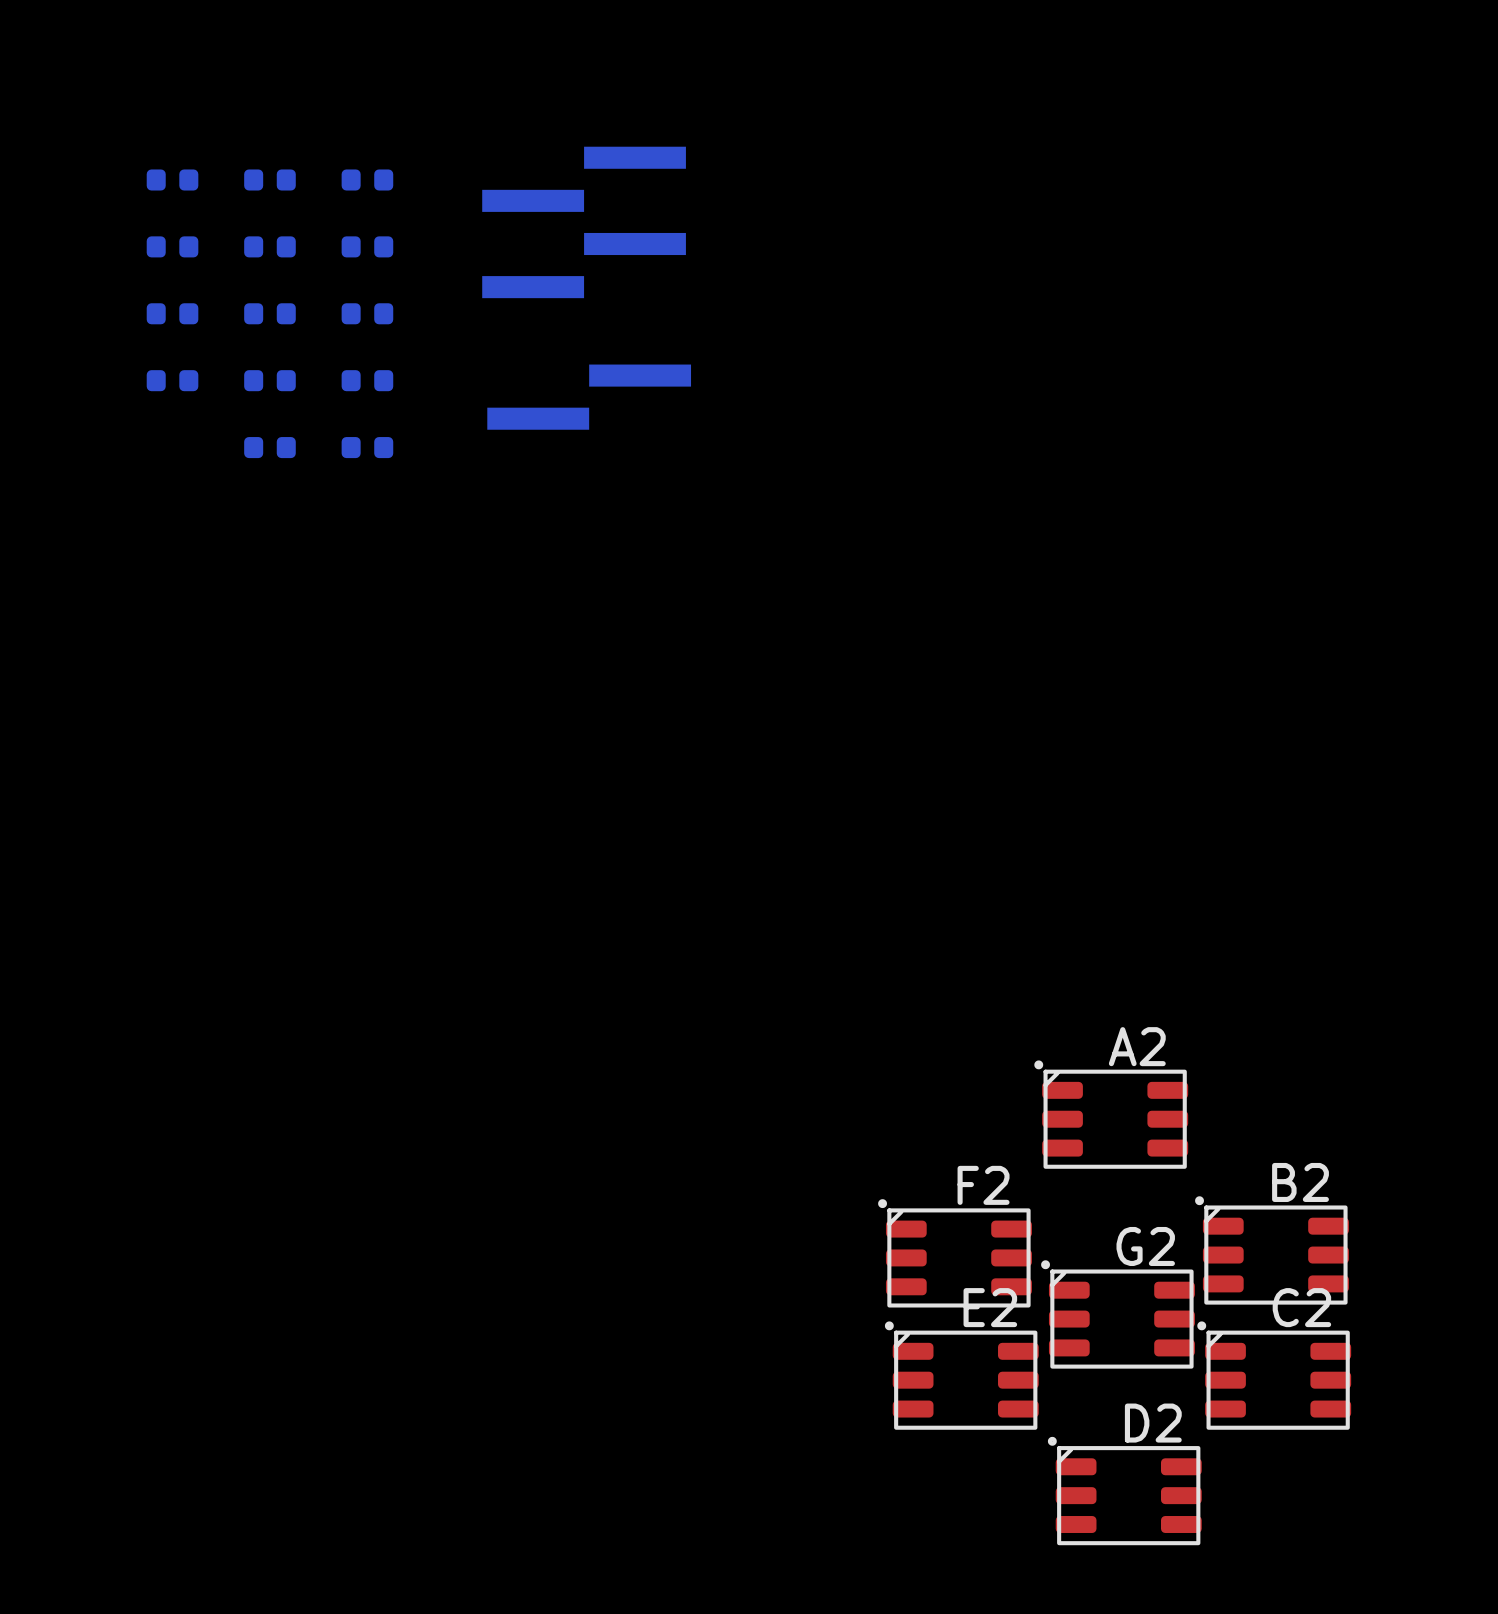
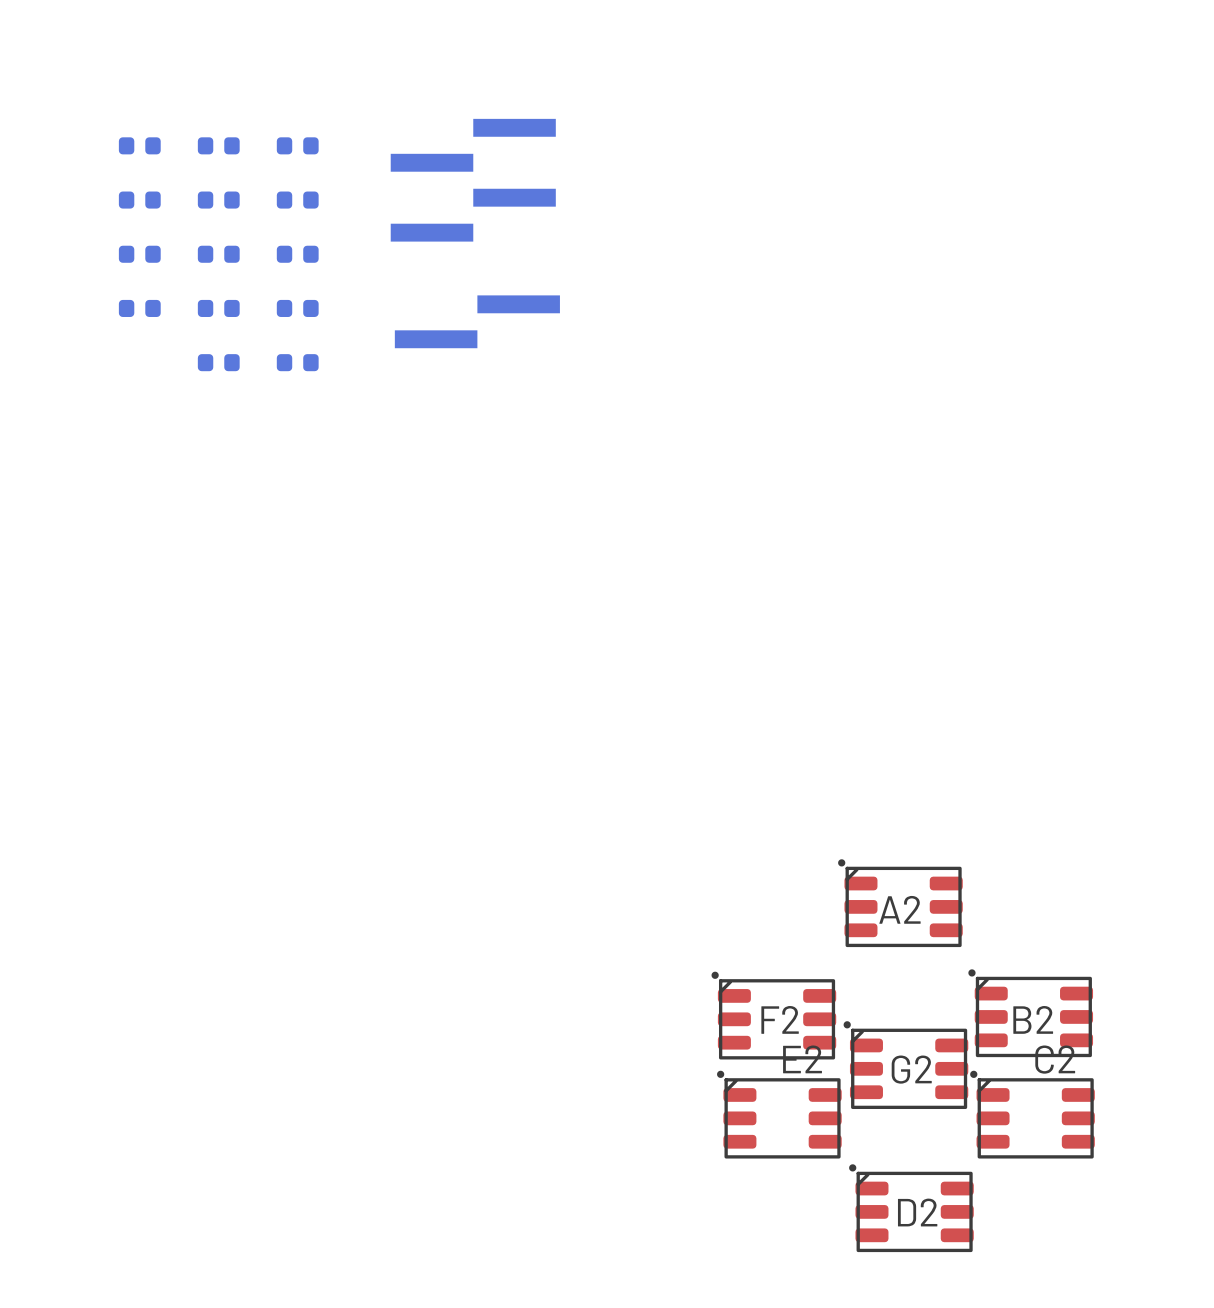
A2 name position: A2 (1137, 1046) -> A2 (899, 909)
B2 name position: B2 (1300, 1182) -> B2 (1033, 1019)
F2 name position: F2 (983, 1185) -> F2 (780, 1019)
G2 name position: G2 (1145, 1246) -> G2 (911, 1069)
D2 name position: D2 (1153, 1423) -> D2 (917, 1212)

